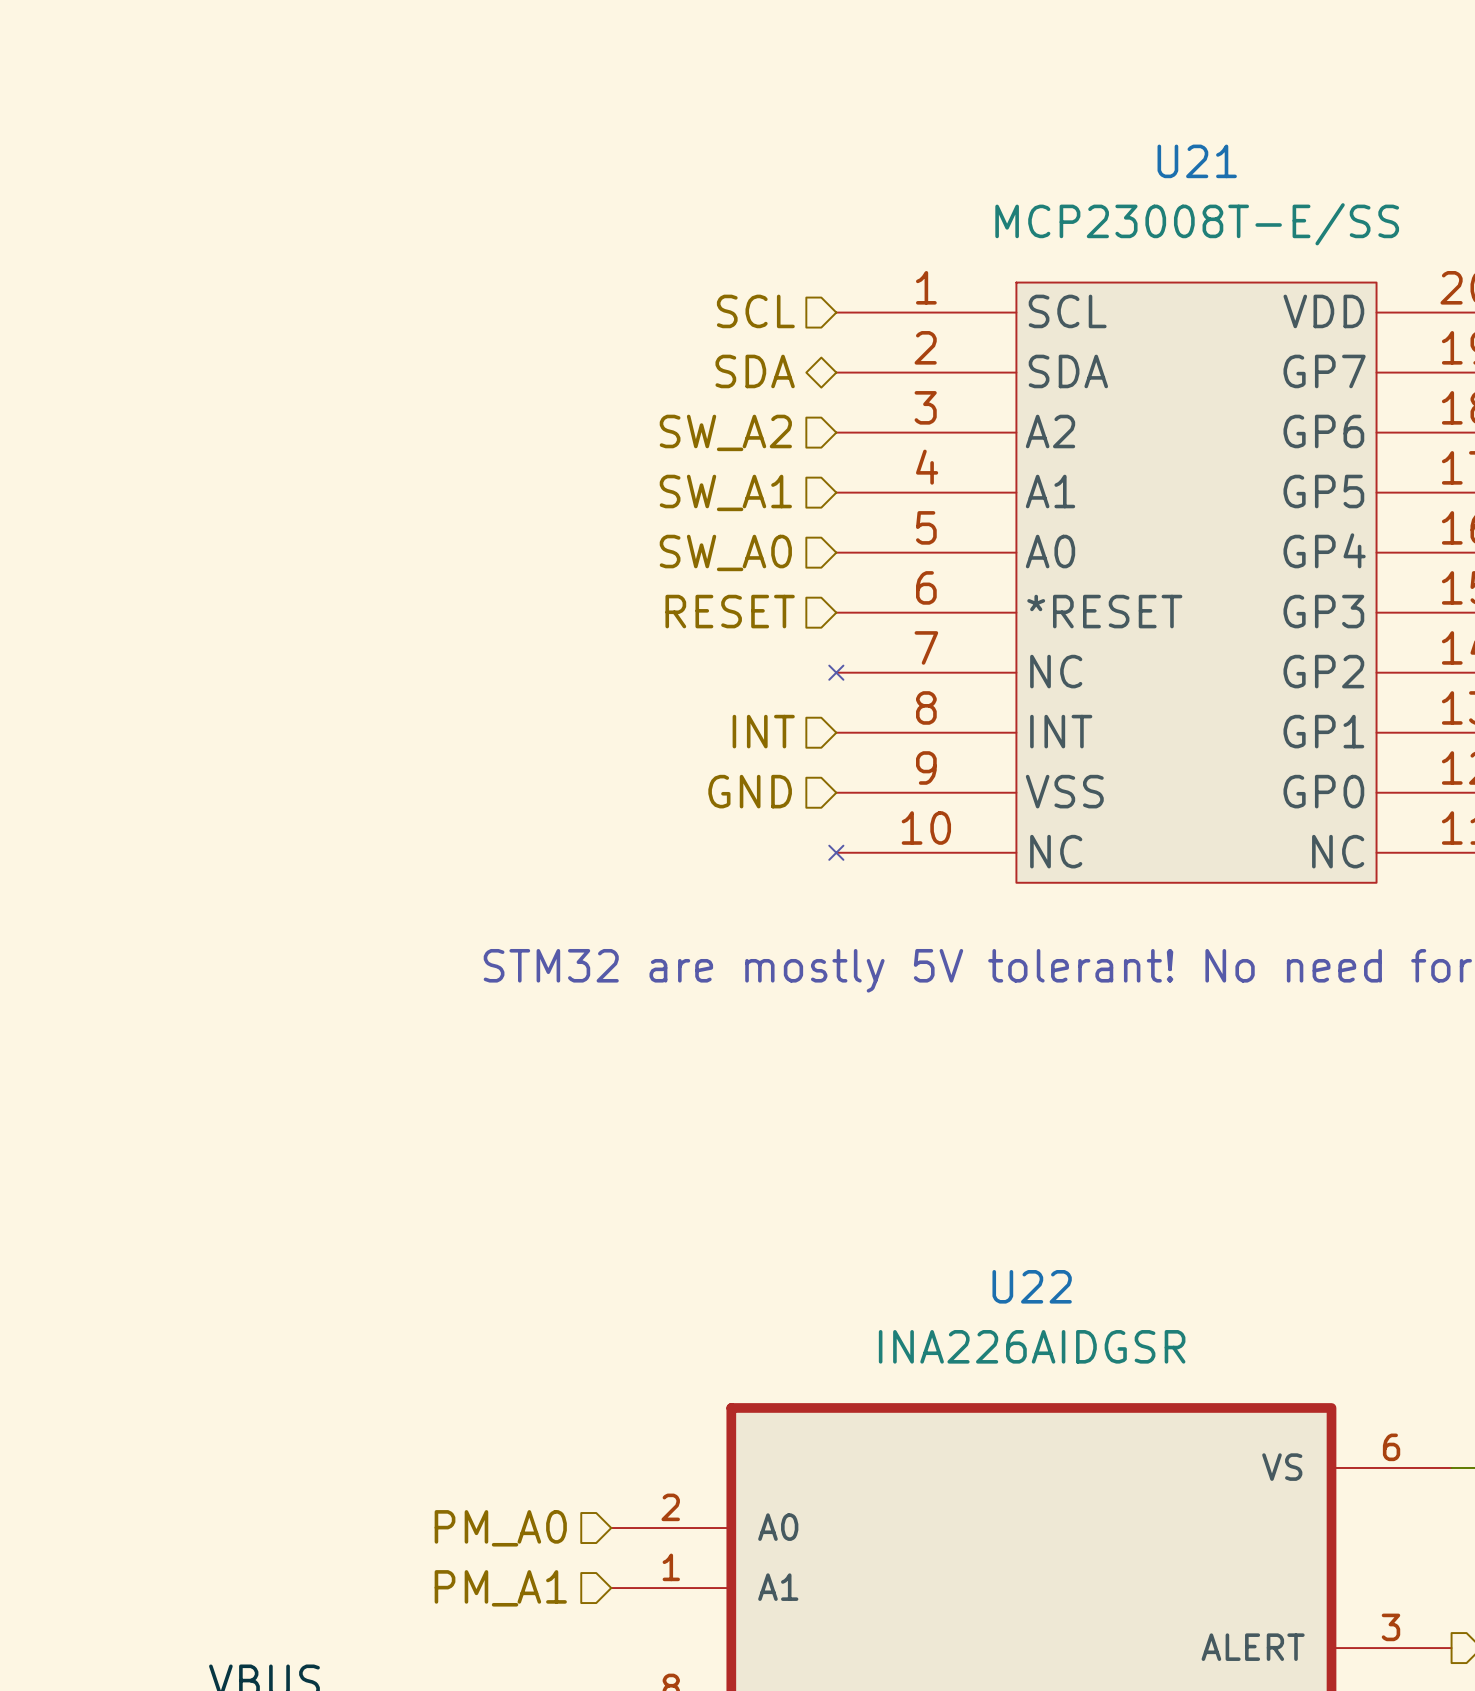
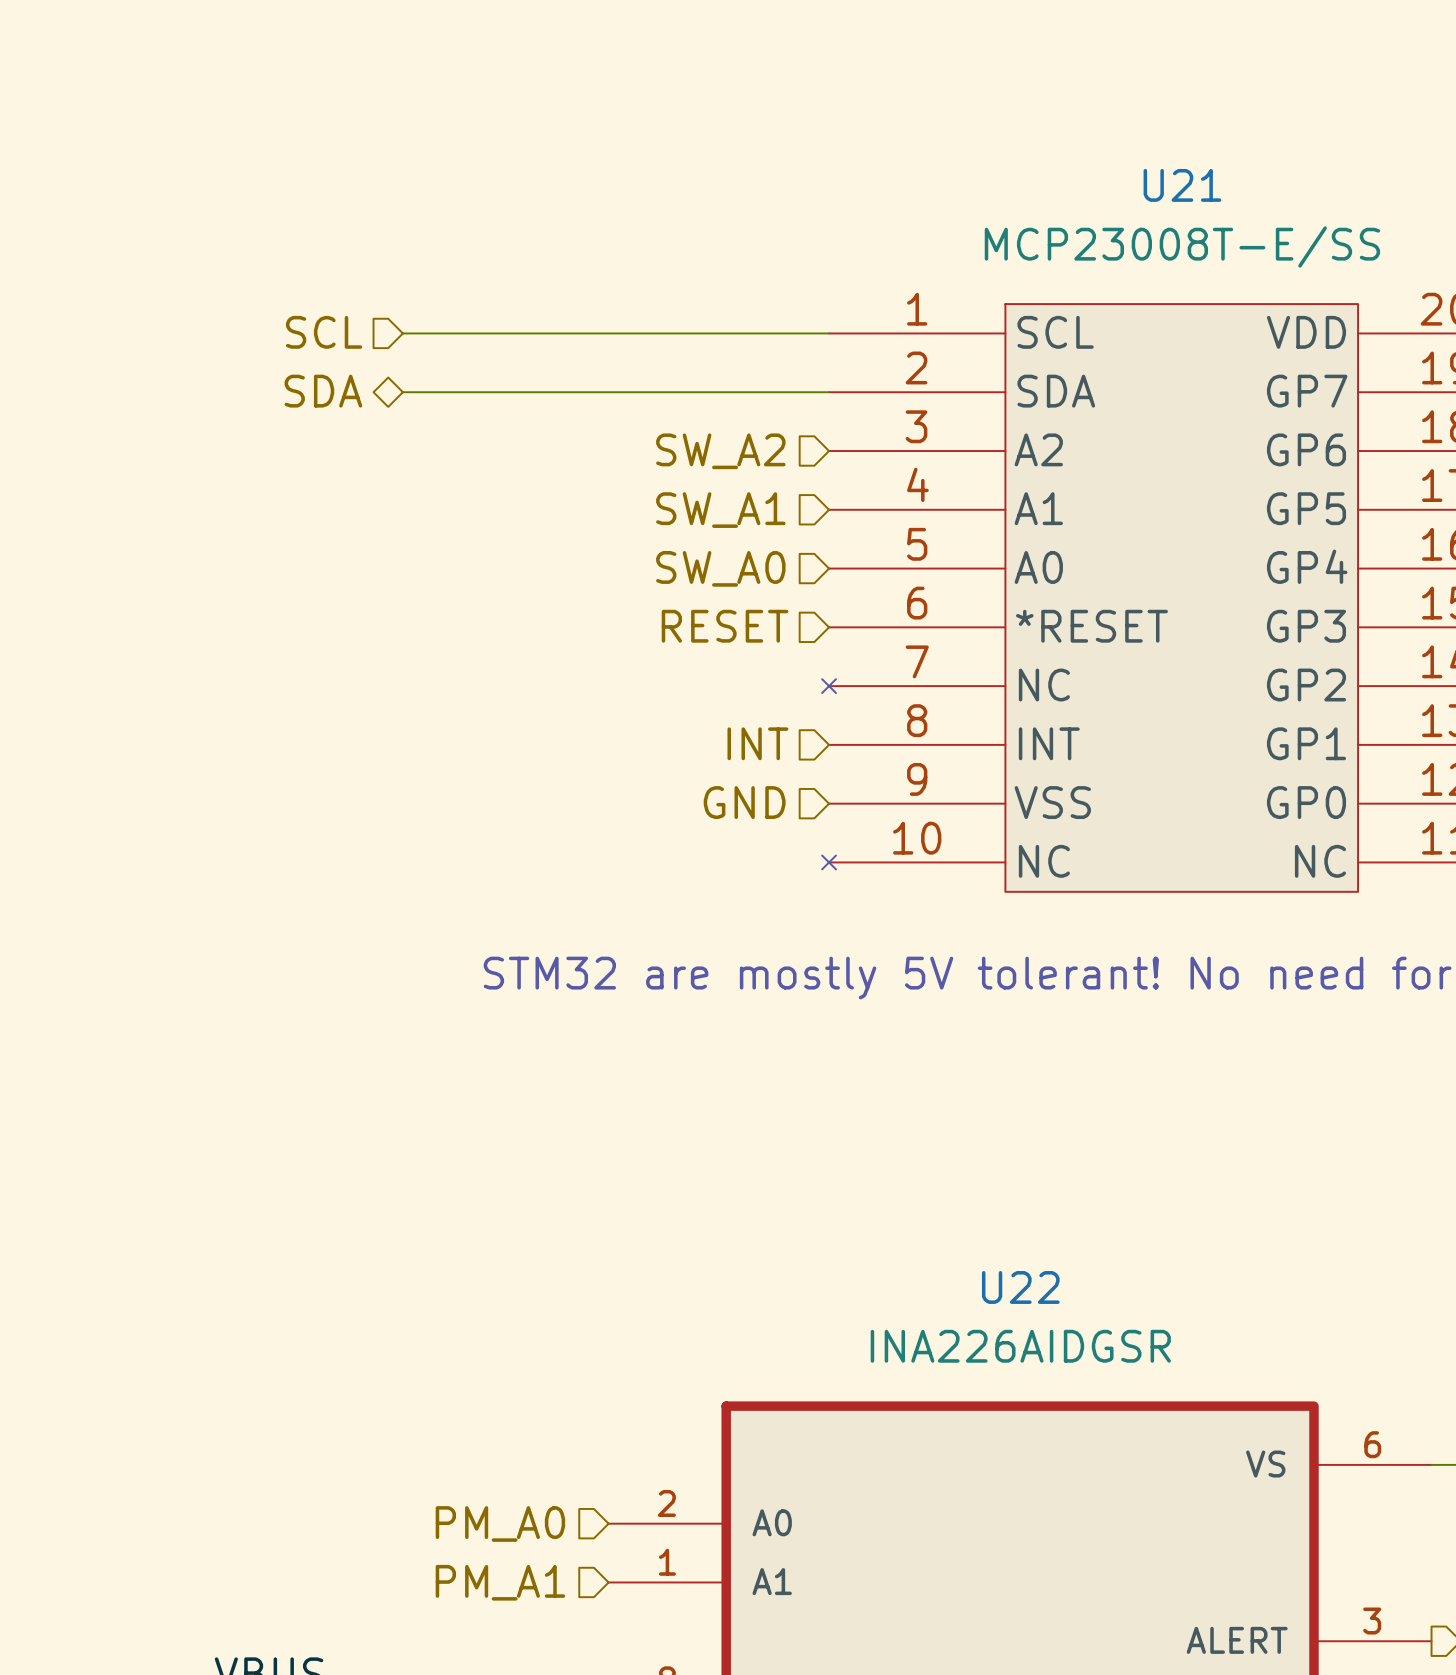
hierarchical label position: SCL (755, 311) -> SCL (324, 332)
wire: none -> (402, 333) (829, 333)
hierarchical label position: SDA (755, 371) -> SDA (323, 391)
wire: none -> (402, 392) (829, 392)

